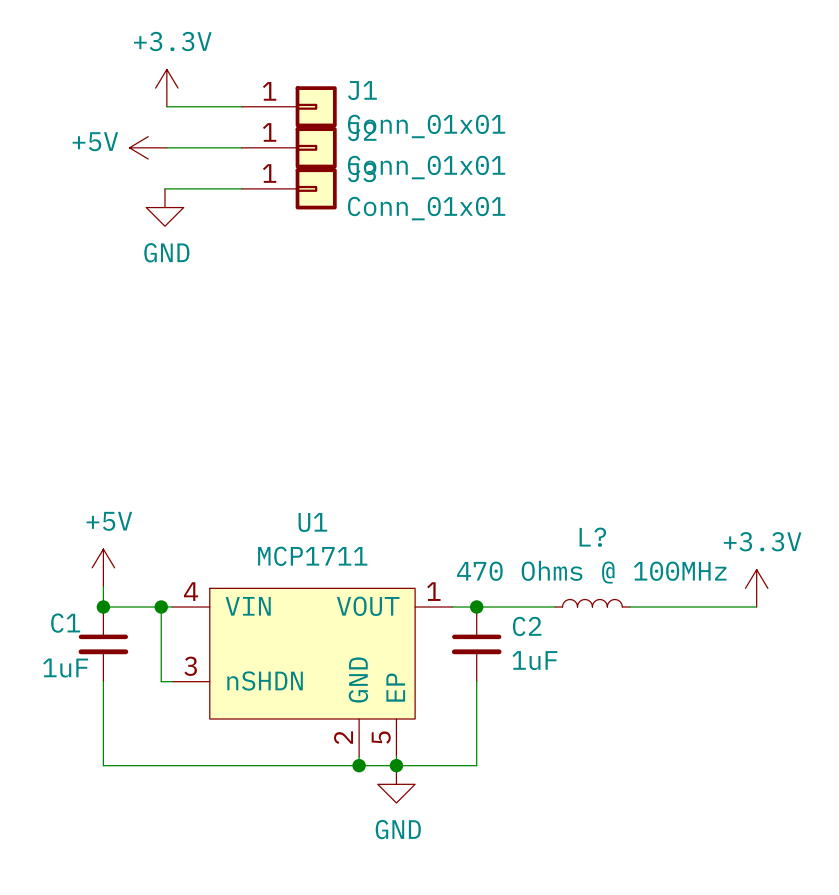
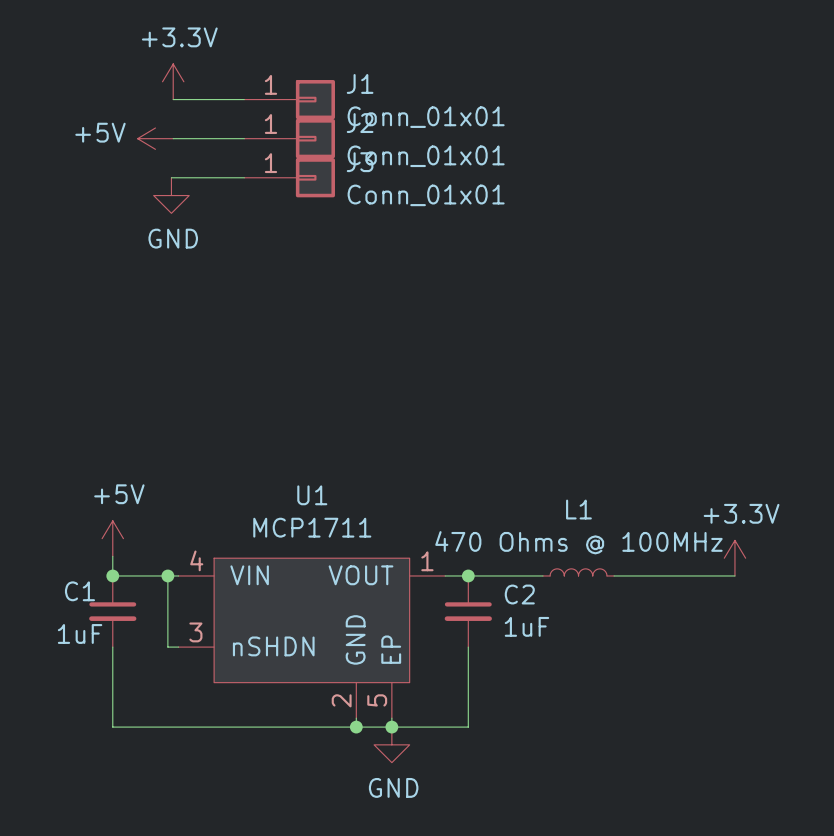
L? name: L? (592, 537) -> L1 (578, 509)

